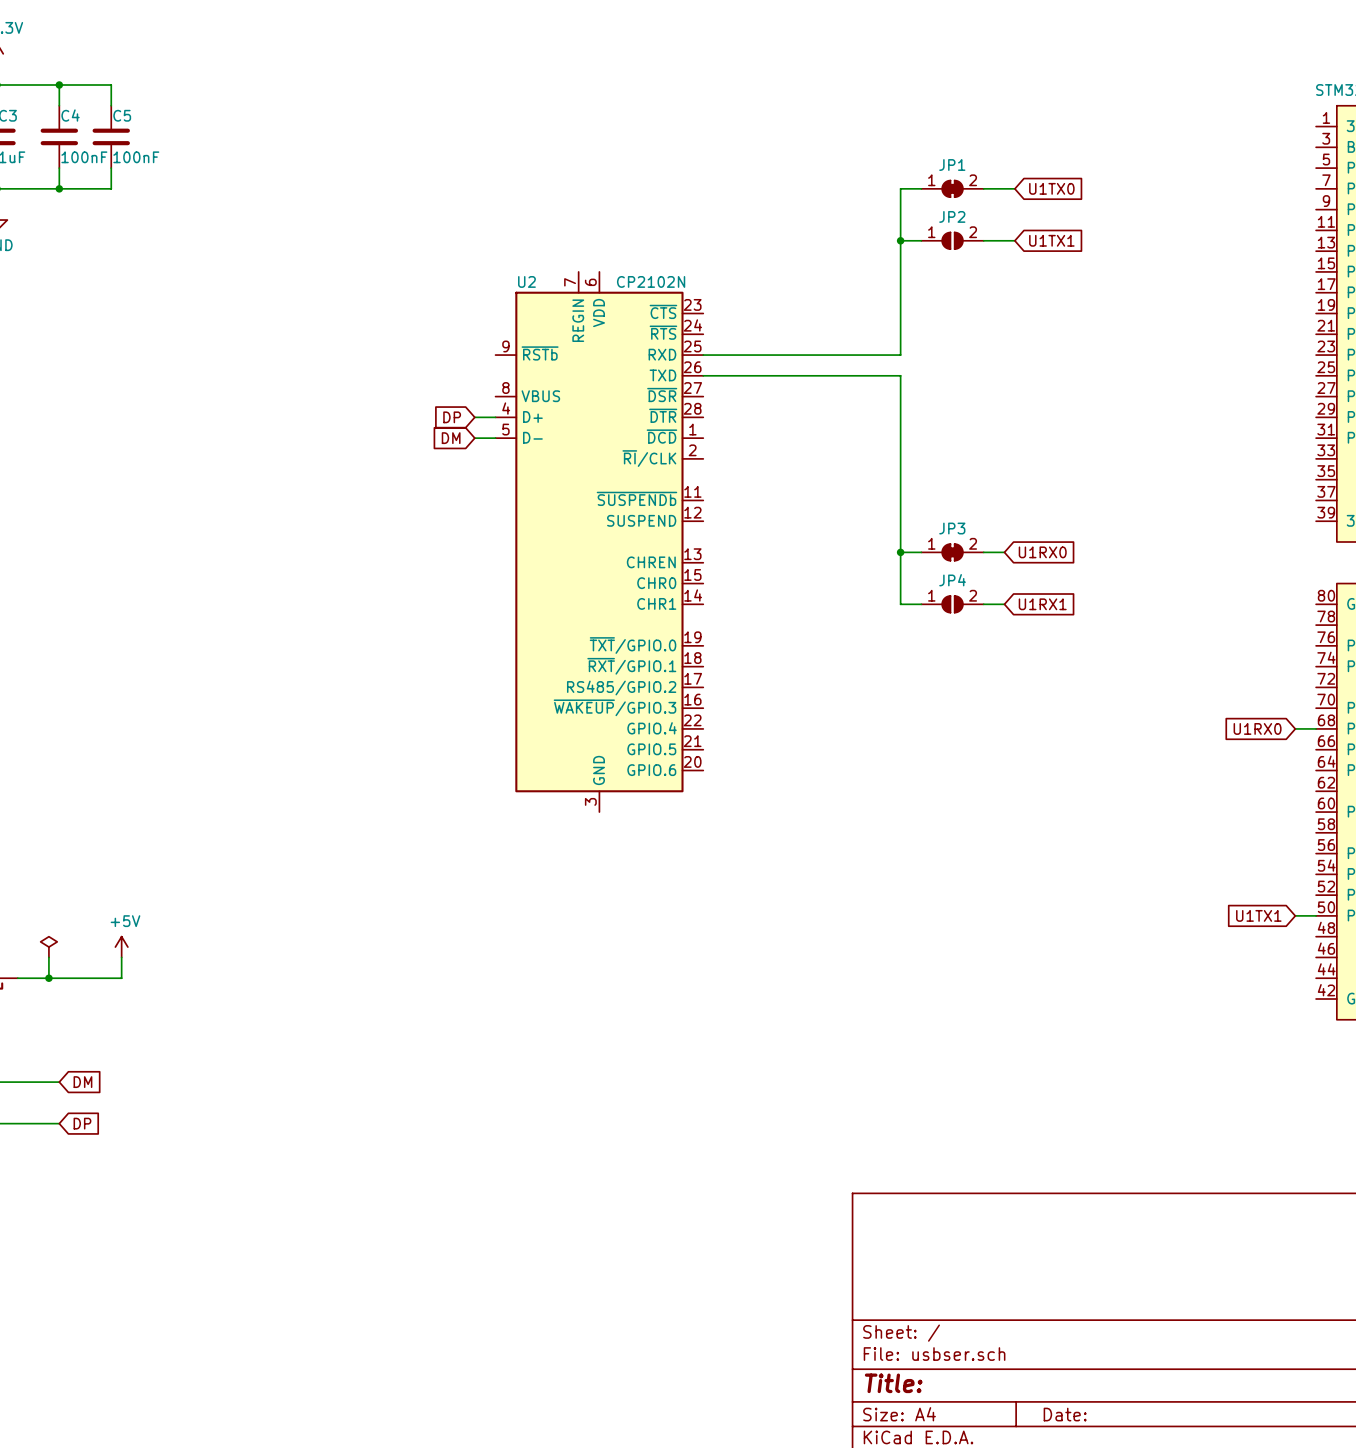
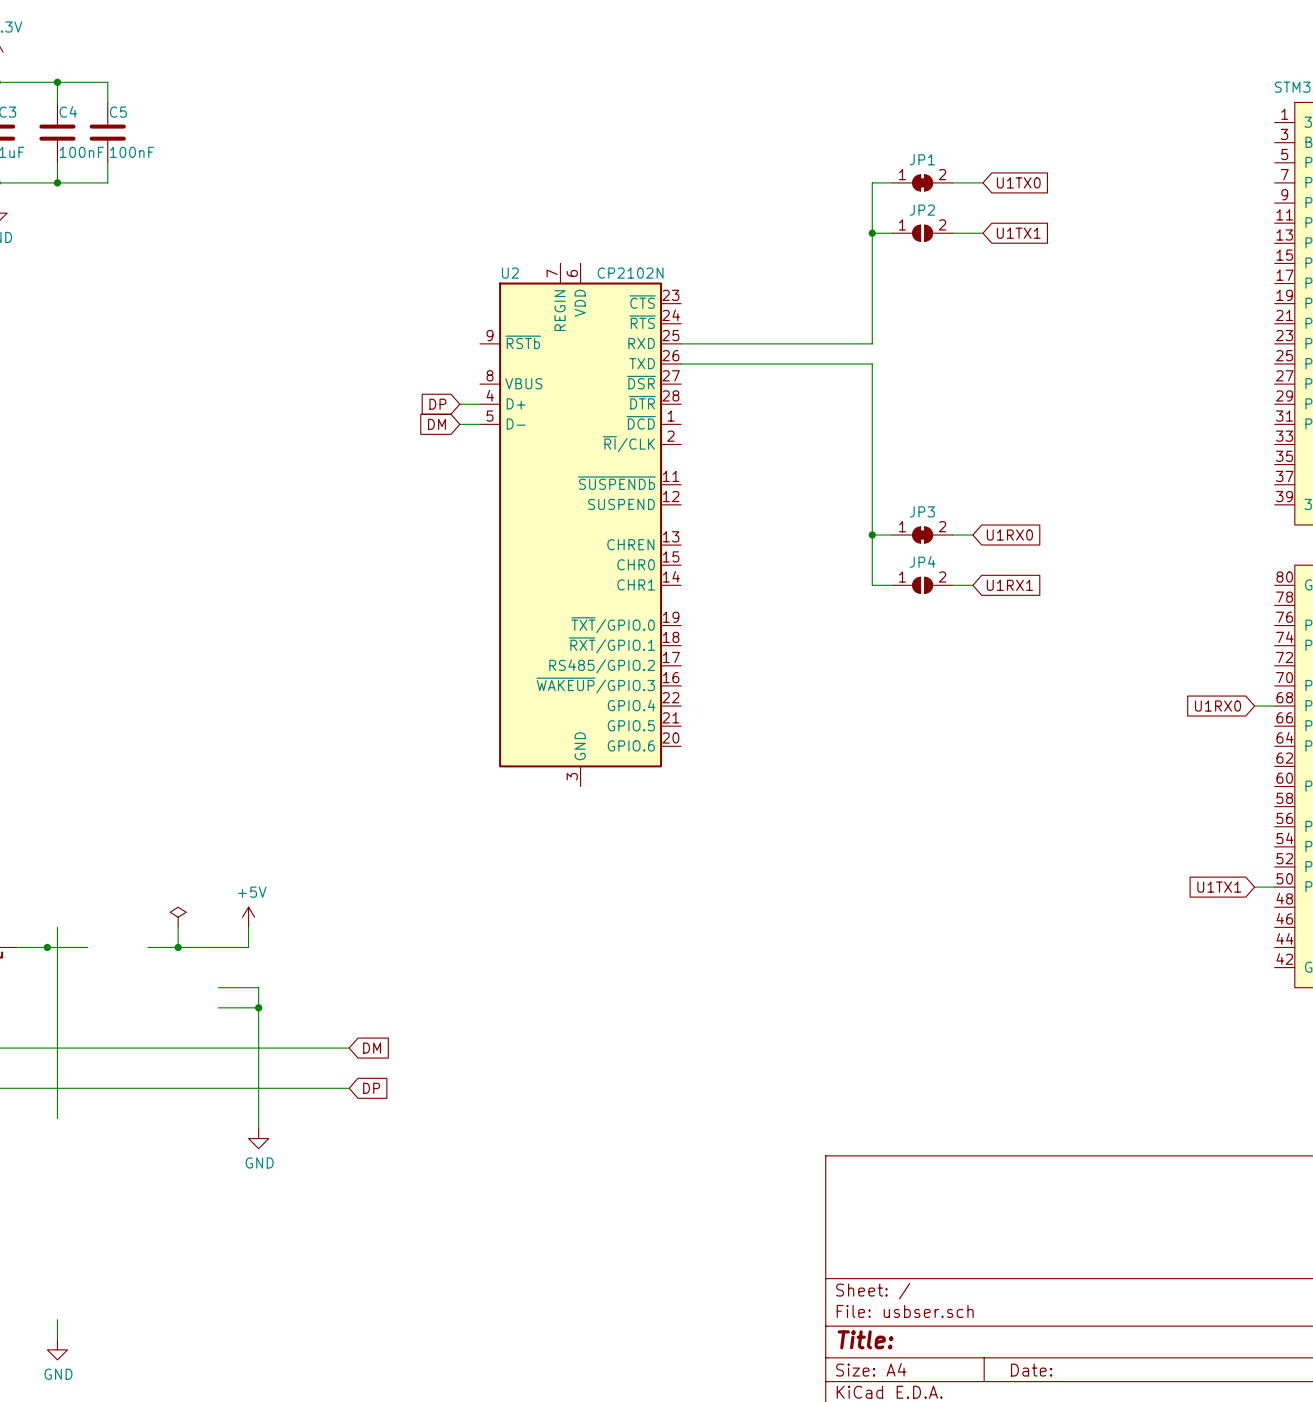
power symbol position: (48, 947) -> (178, 917)
power symbol position: +5V (121, 947) -> +5V (248, 917)
wire: (48, 957) (48, 978) -> (178, 927) (178, 947)
wire: none -> (57, 927) (57, 1118)
wire: (121, 957) (121, 978) (90, 978) -> none
wire: none -> (248, 927) (248, 947) (147, 947)
junction: none -> (178, 947)
wire: none -> (218, 987) (258, 987) (258, 1128)
wire: none -> (218, 1007) (258, 1007)
junction: none -> (258, 1007)
wire: none -> (57, 1048) (349, 1048)
global label: DM (82, 1082) -> none
global label: none -> DM (372, 1048)
wire: none -> (57, 1088) (349, 1088)
global label: DP (82, 1123) -> none
global label: none -> DP (371, 1088)
power symbol: none -> GND (258, 1138)
wire: none -> (57, 1319) (57, 1339)
power symbol: none -> GND (57, 1349)

